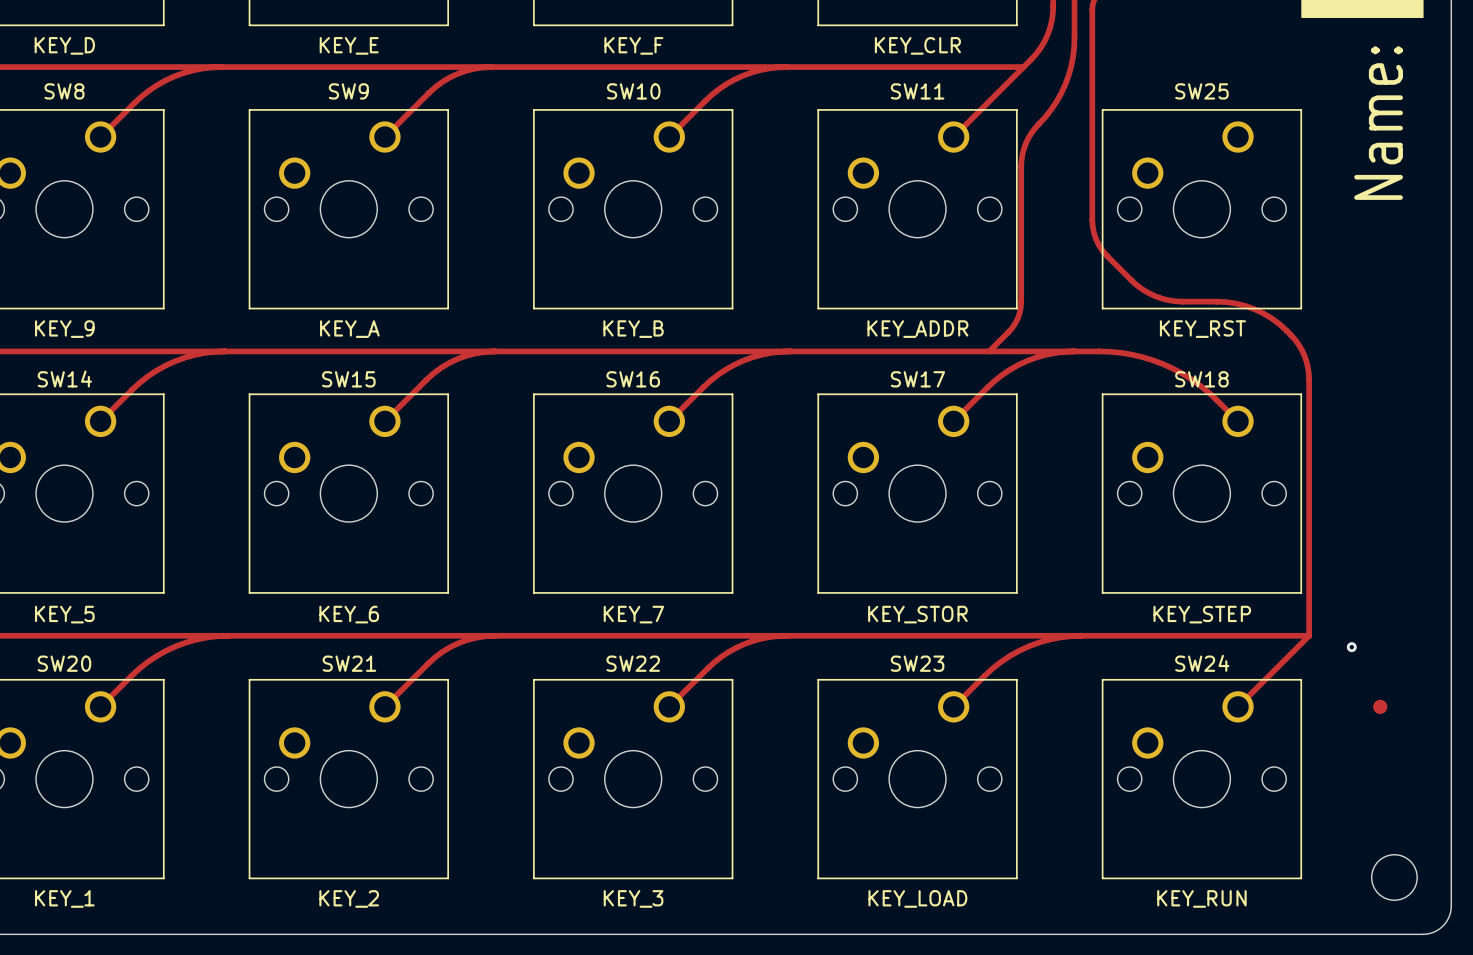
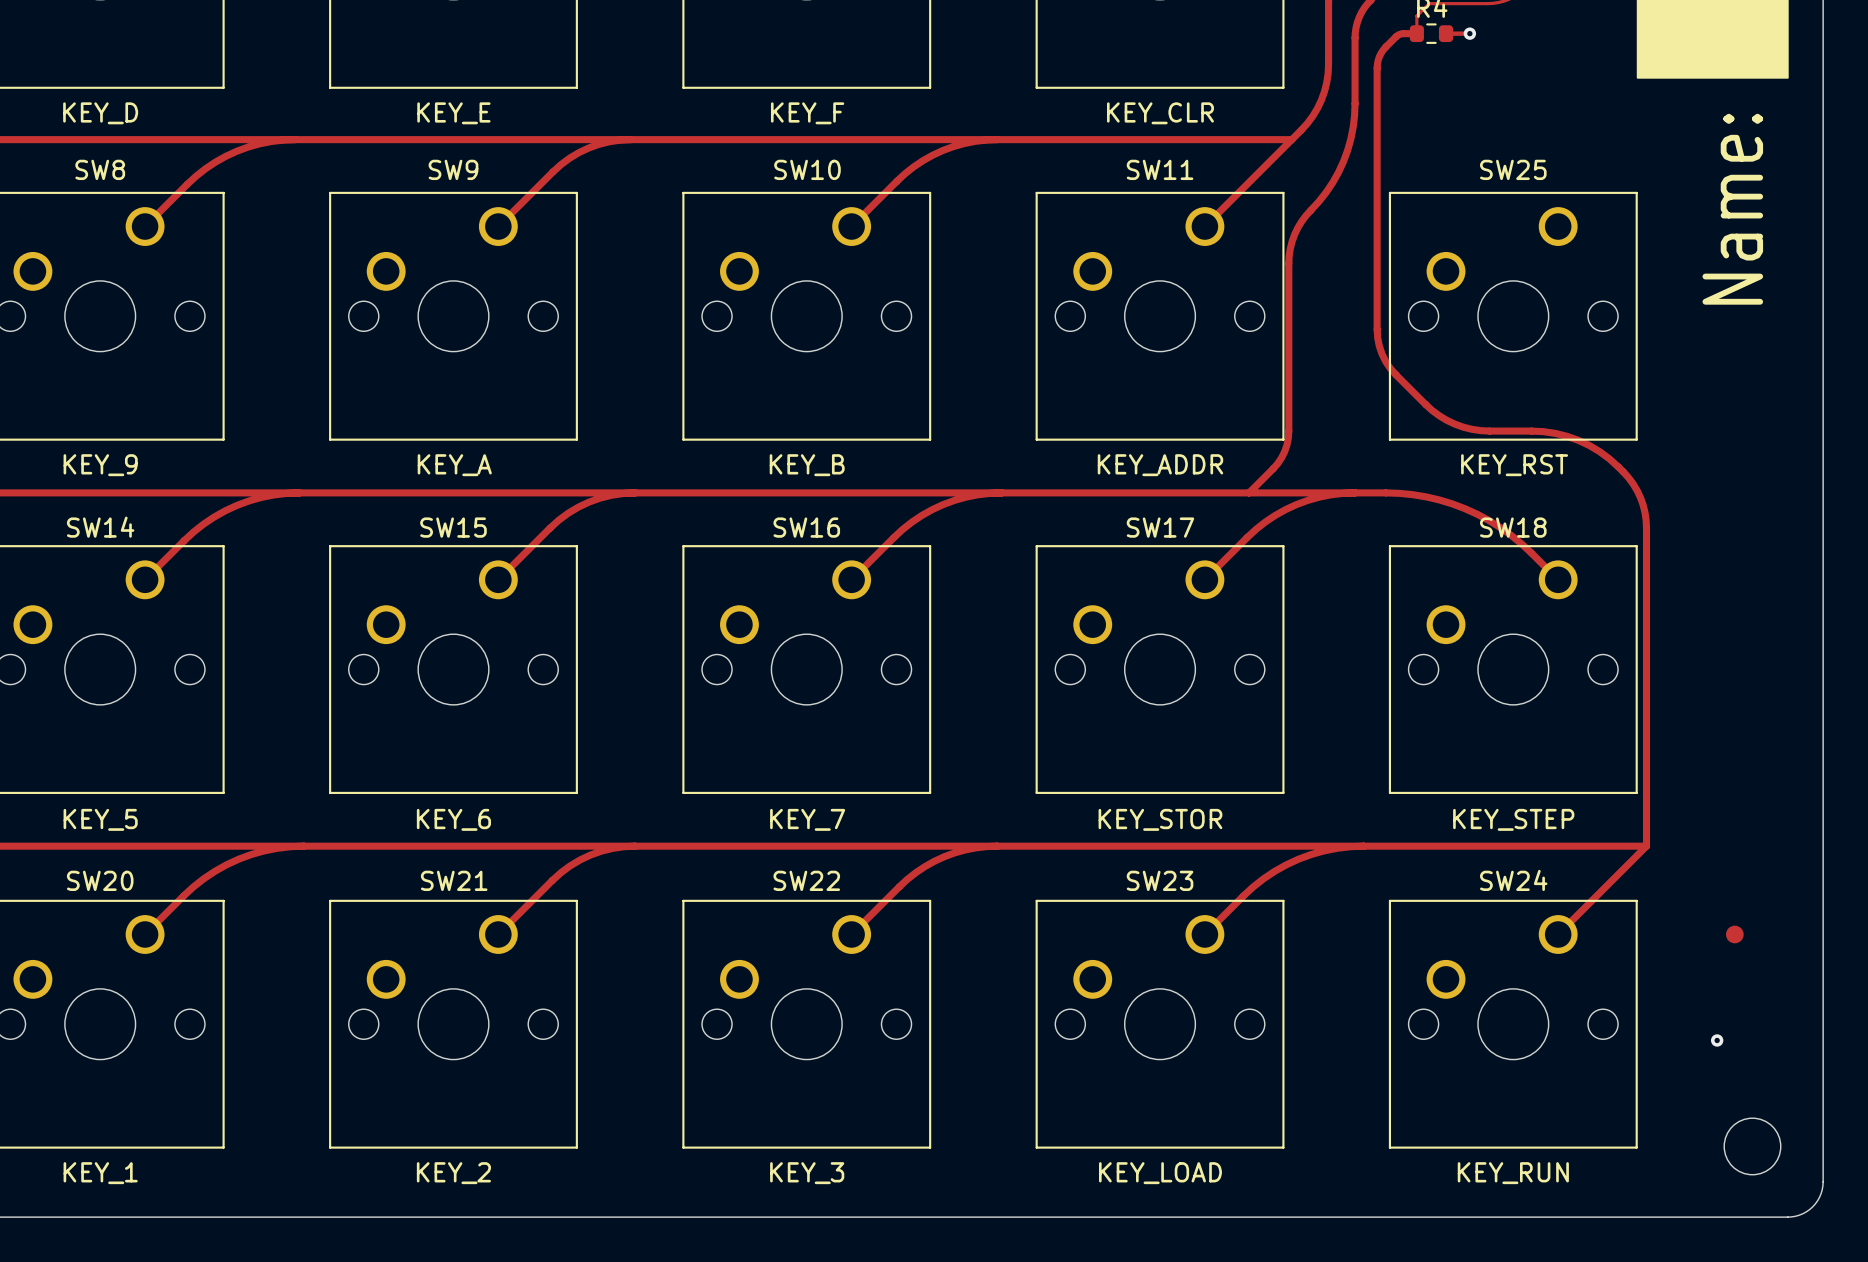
via: (1351, 647) -> none
via: none -> (1717, 1040)

